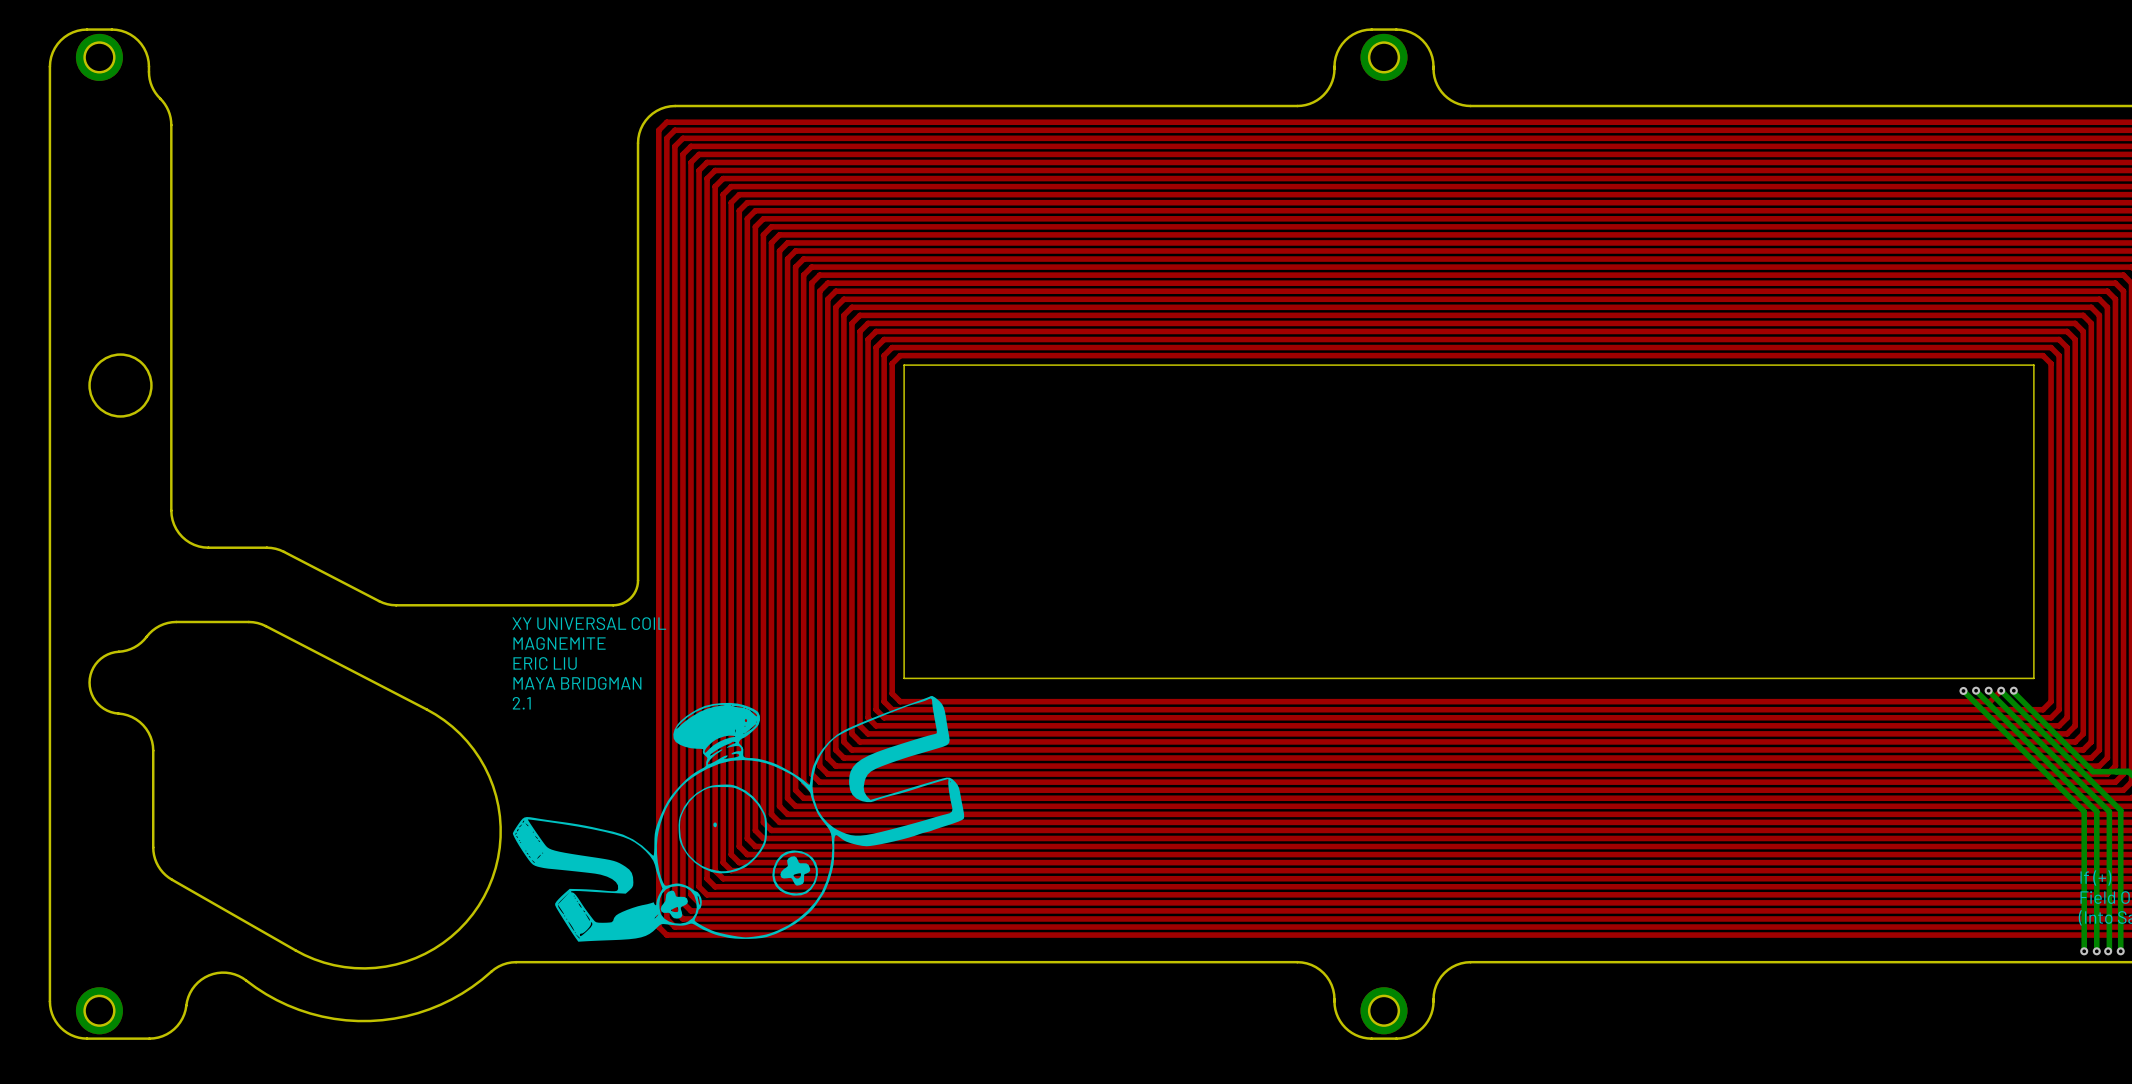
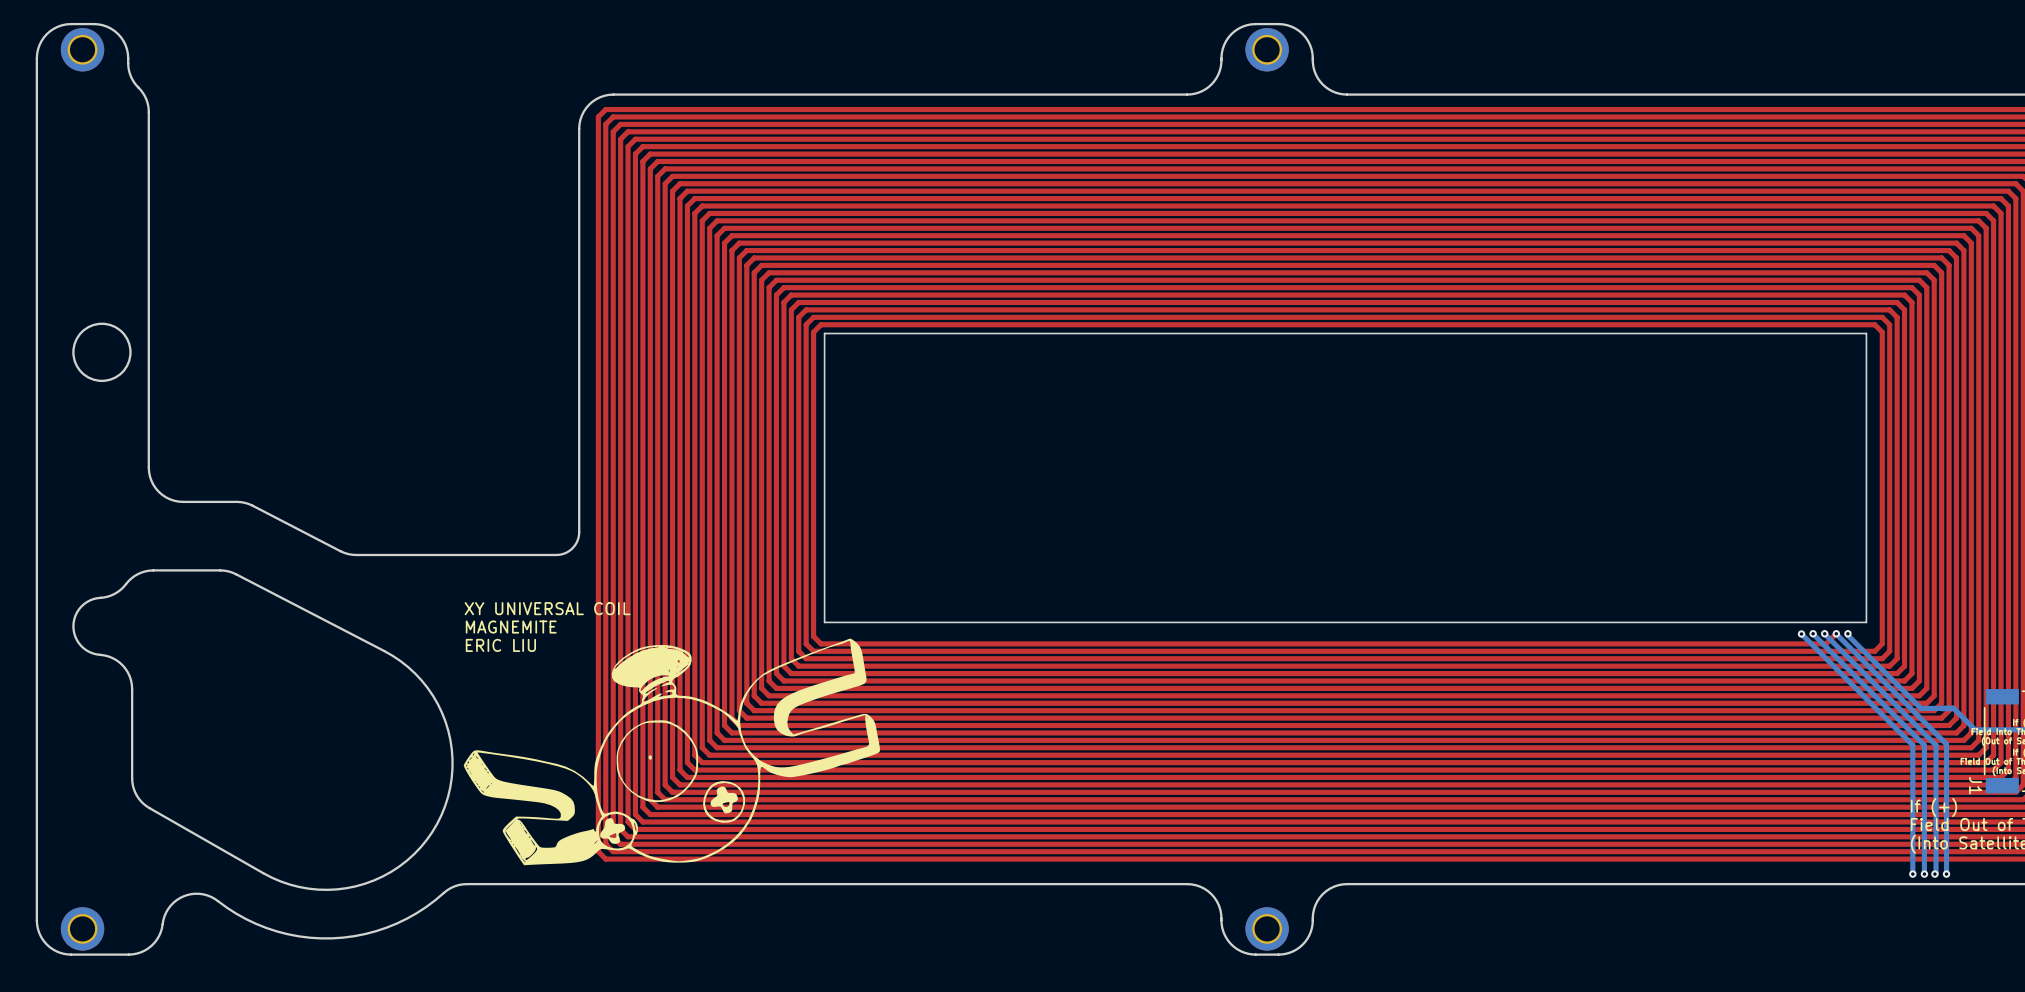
text: XY UNIVERSAL COIL (589, 623) -> none
text: MAGNEMITE (559, 643) -> none
text: ERIC LIU (545, 663) -> XY UNIVERSAL COIL (547, 608)
text: MAYA BRIDGMAN (577, 683) -> MAGNEMITE (511, 627)
text: 2.1 (521, 703) -> ERIC LIU (500, 645)

